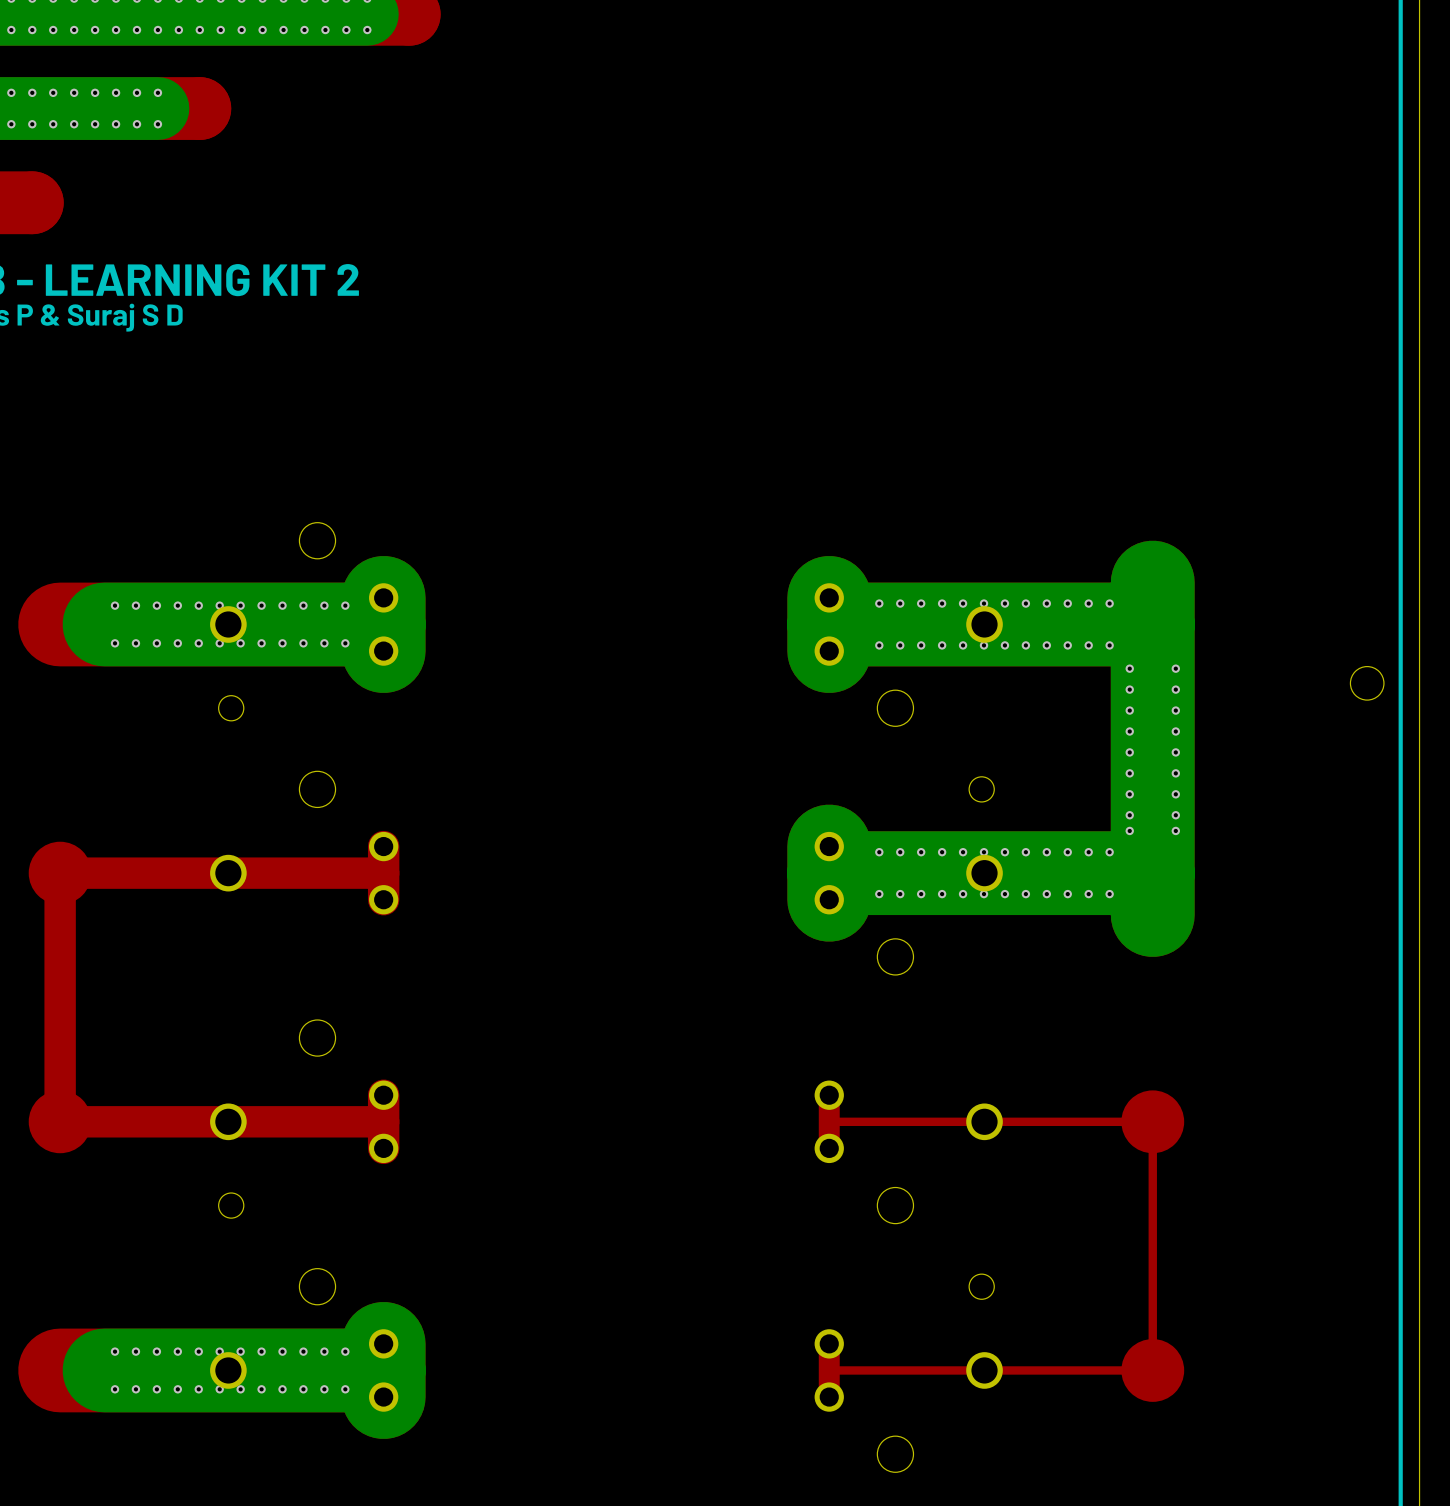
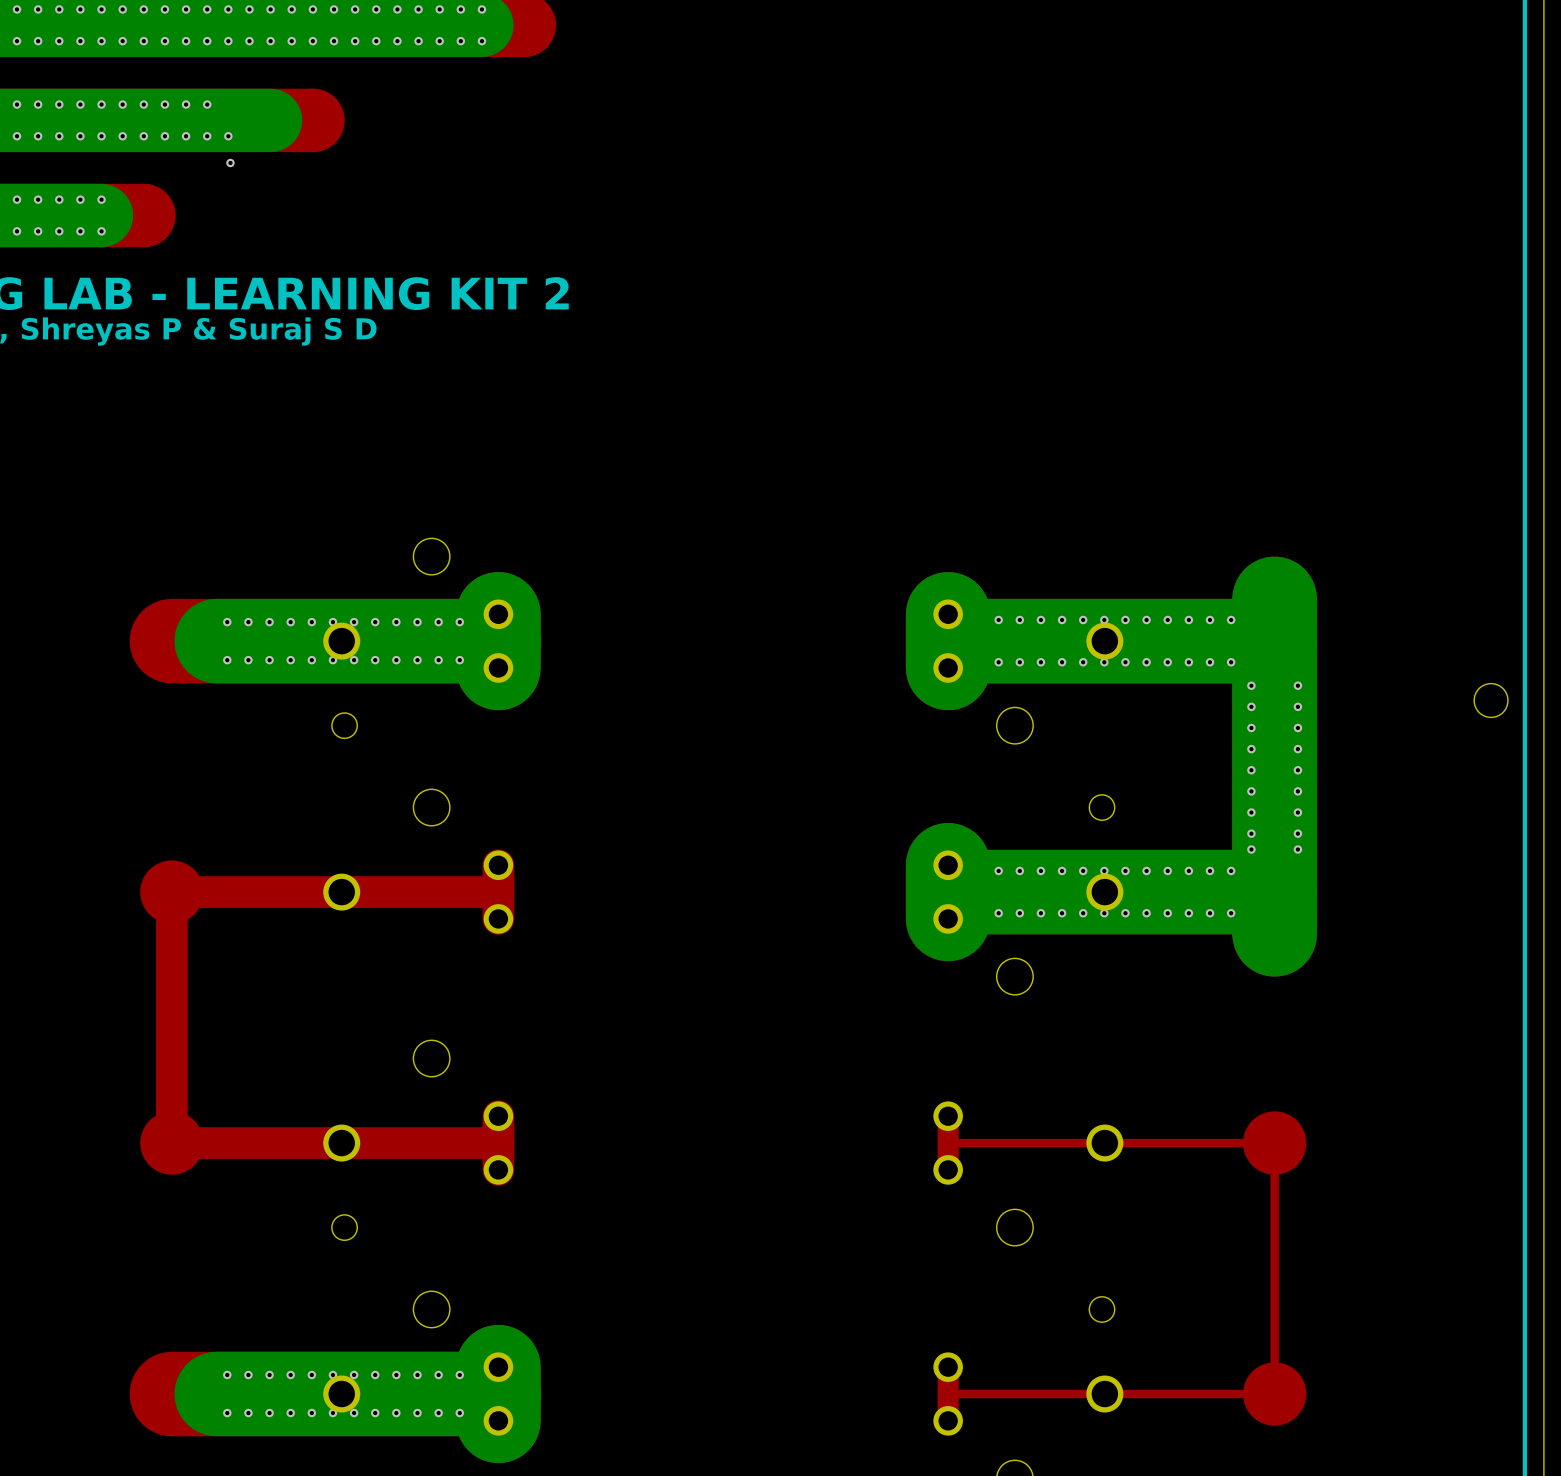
via: (116, 92) -> none
via: (136, 92) -> none
via: (157, 92) -> none
via: (136, 124) -> none
via: (157, 124) -> none
via: none -> (230, 162)

